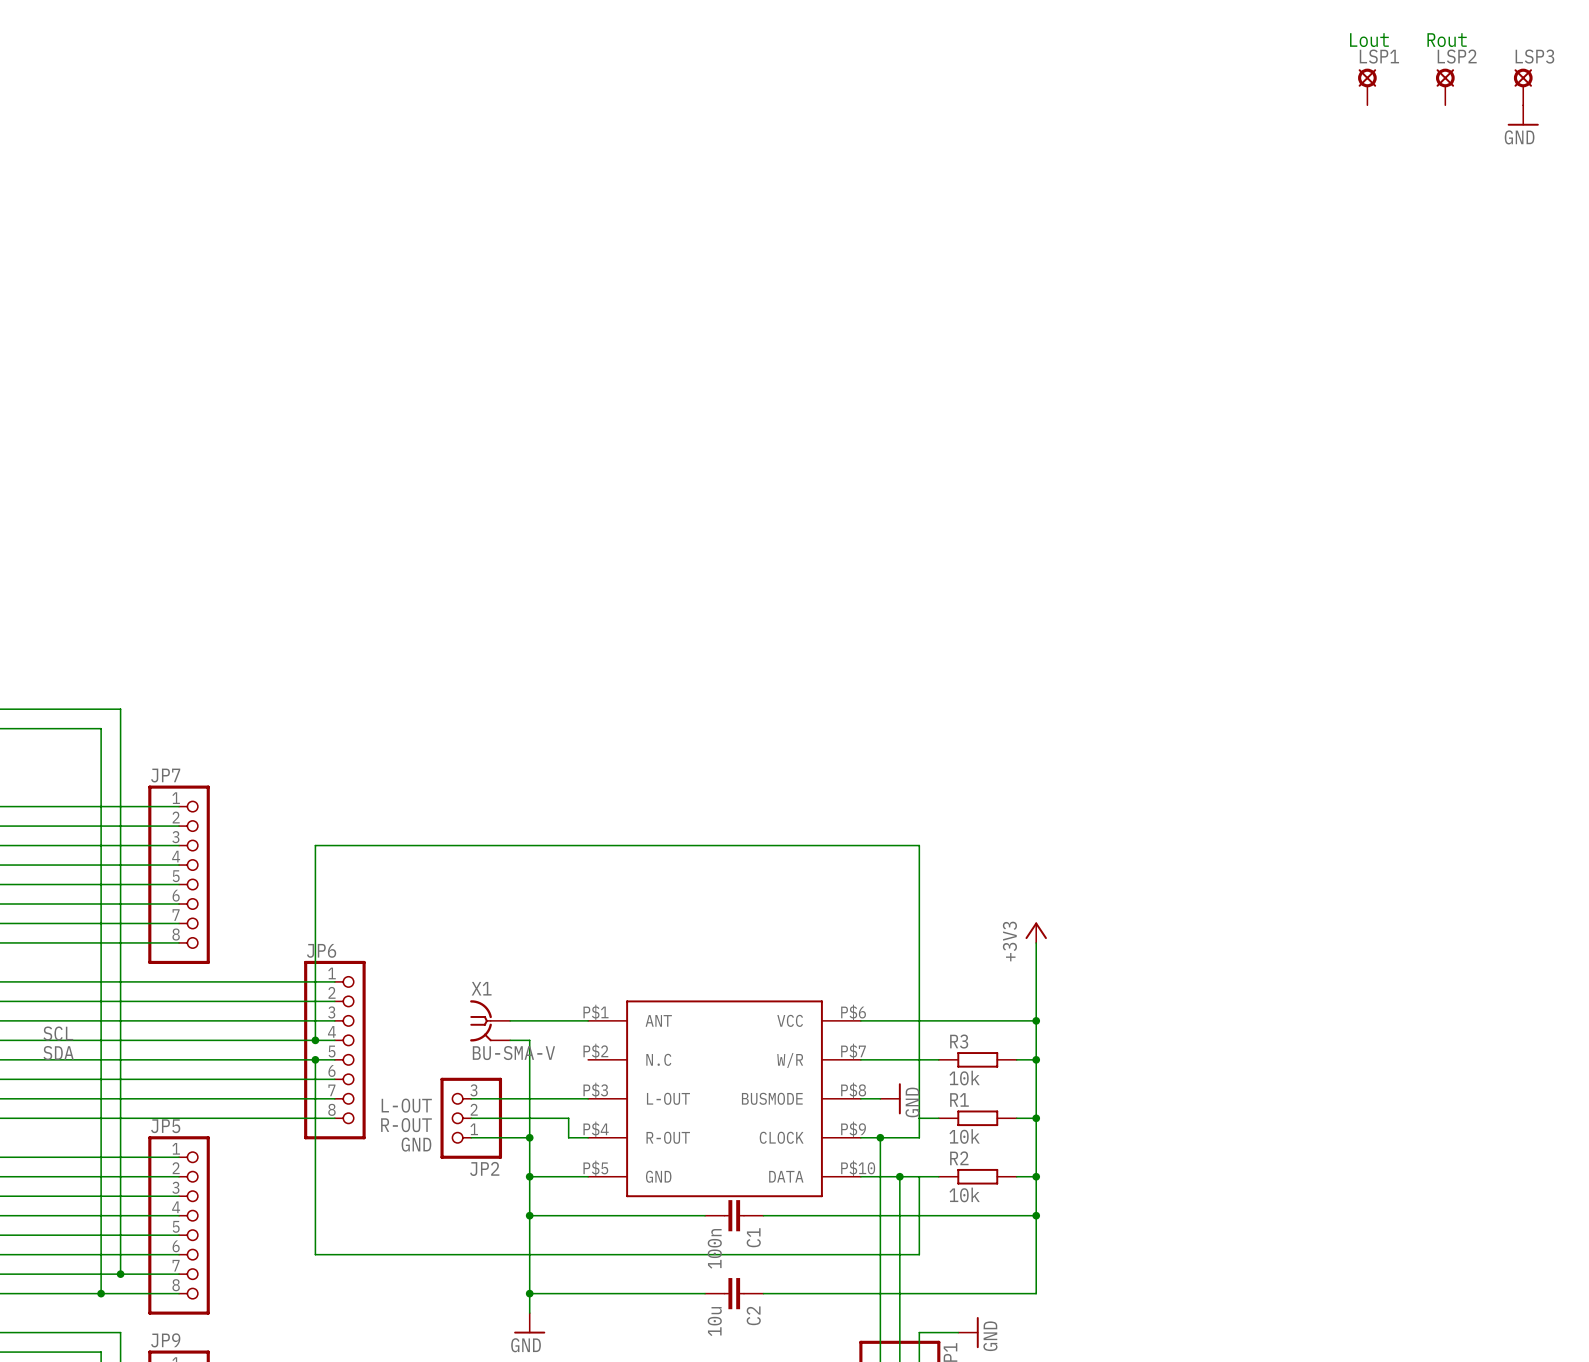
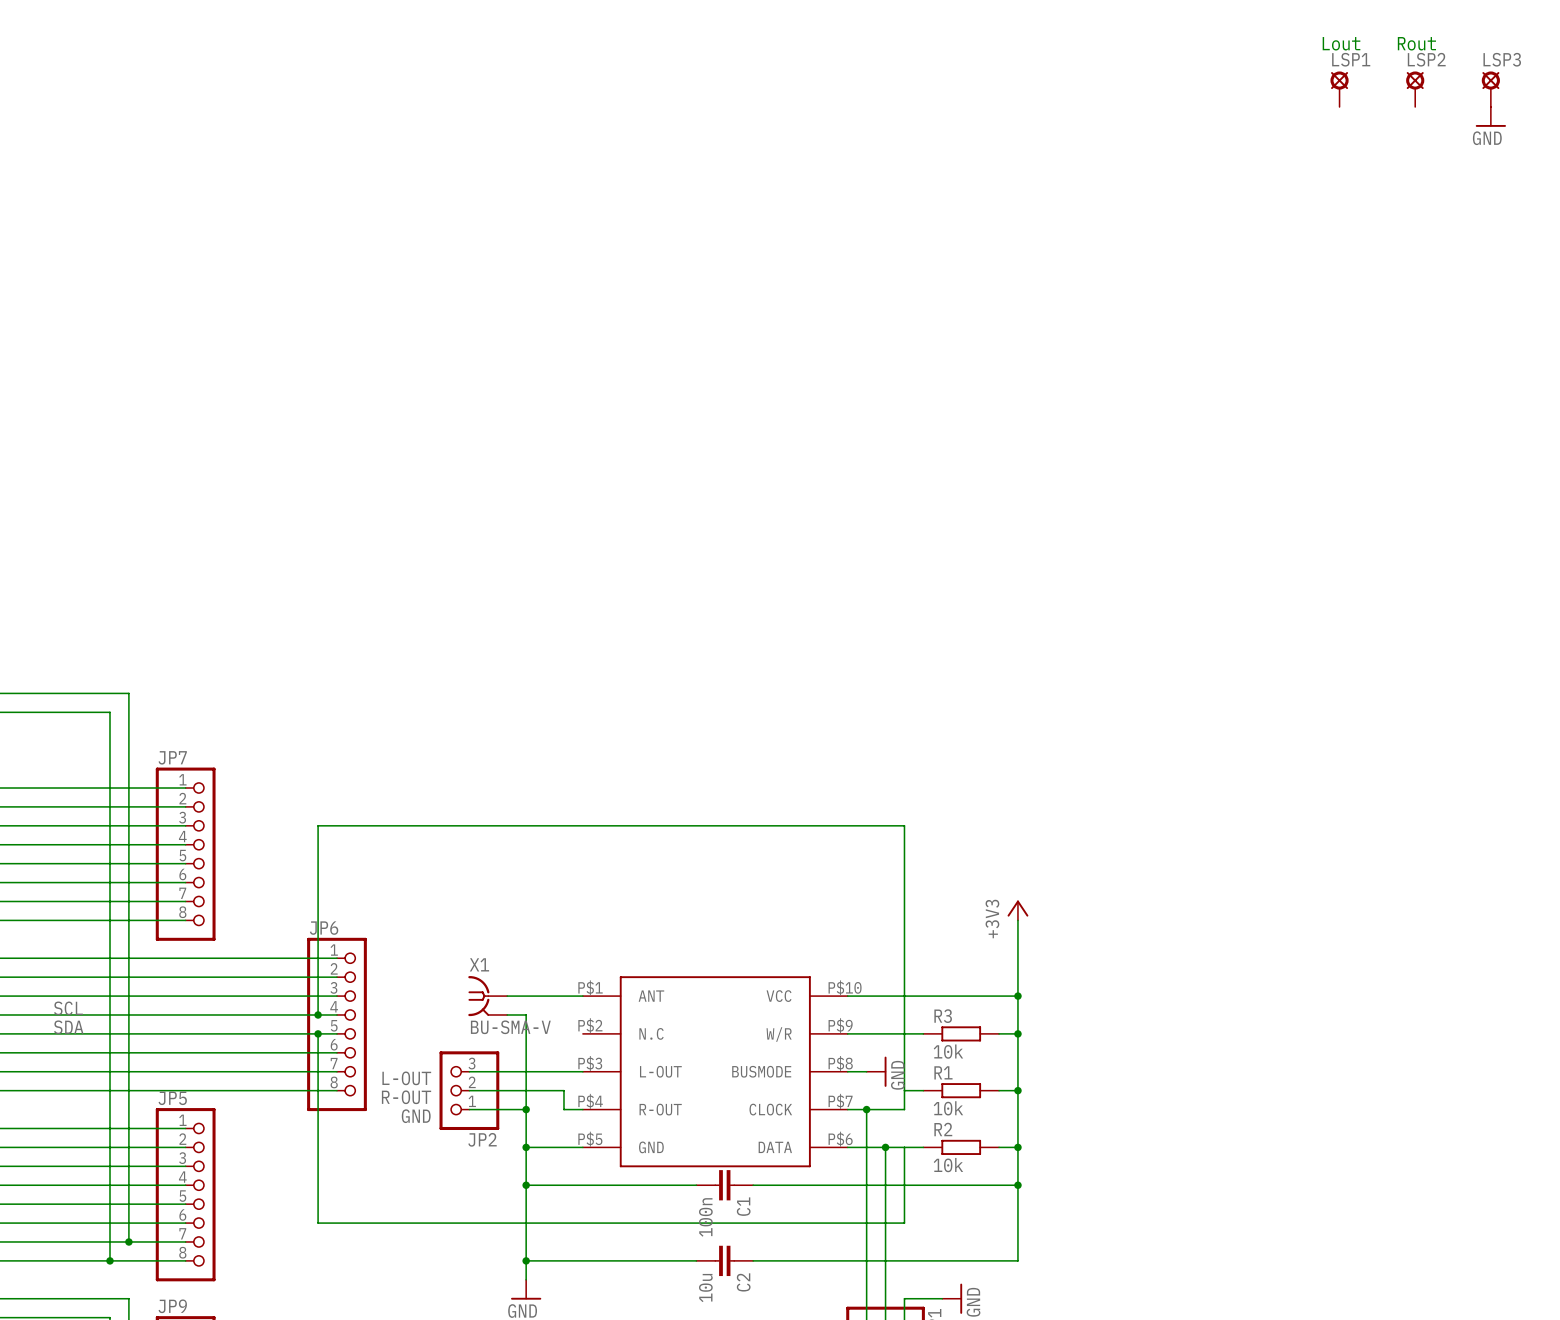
part pin number: P$6 (853, 1012) -> P$10 (845, 987)
part pin number: P$7 (853, 1051) -> P$9 (840, 1025)
part pin number: P$9 (853, 1129) -> P$7 (840, 1101)
part pin number: P$10 (858, 1168) -> P$6 (840, 1139)

